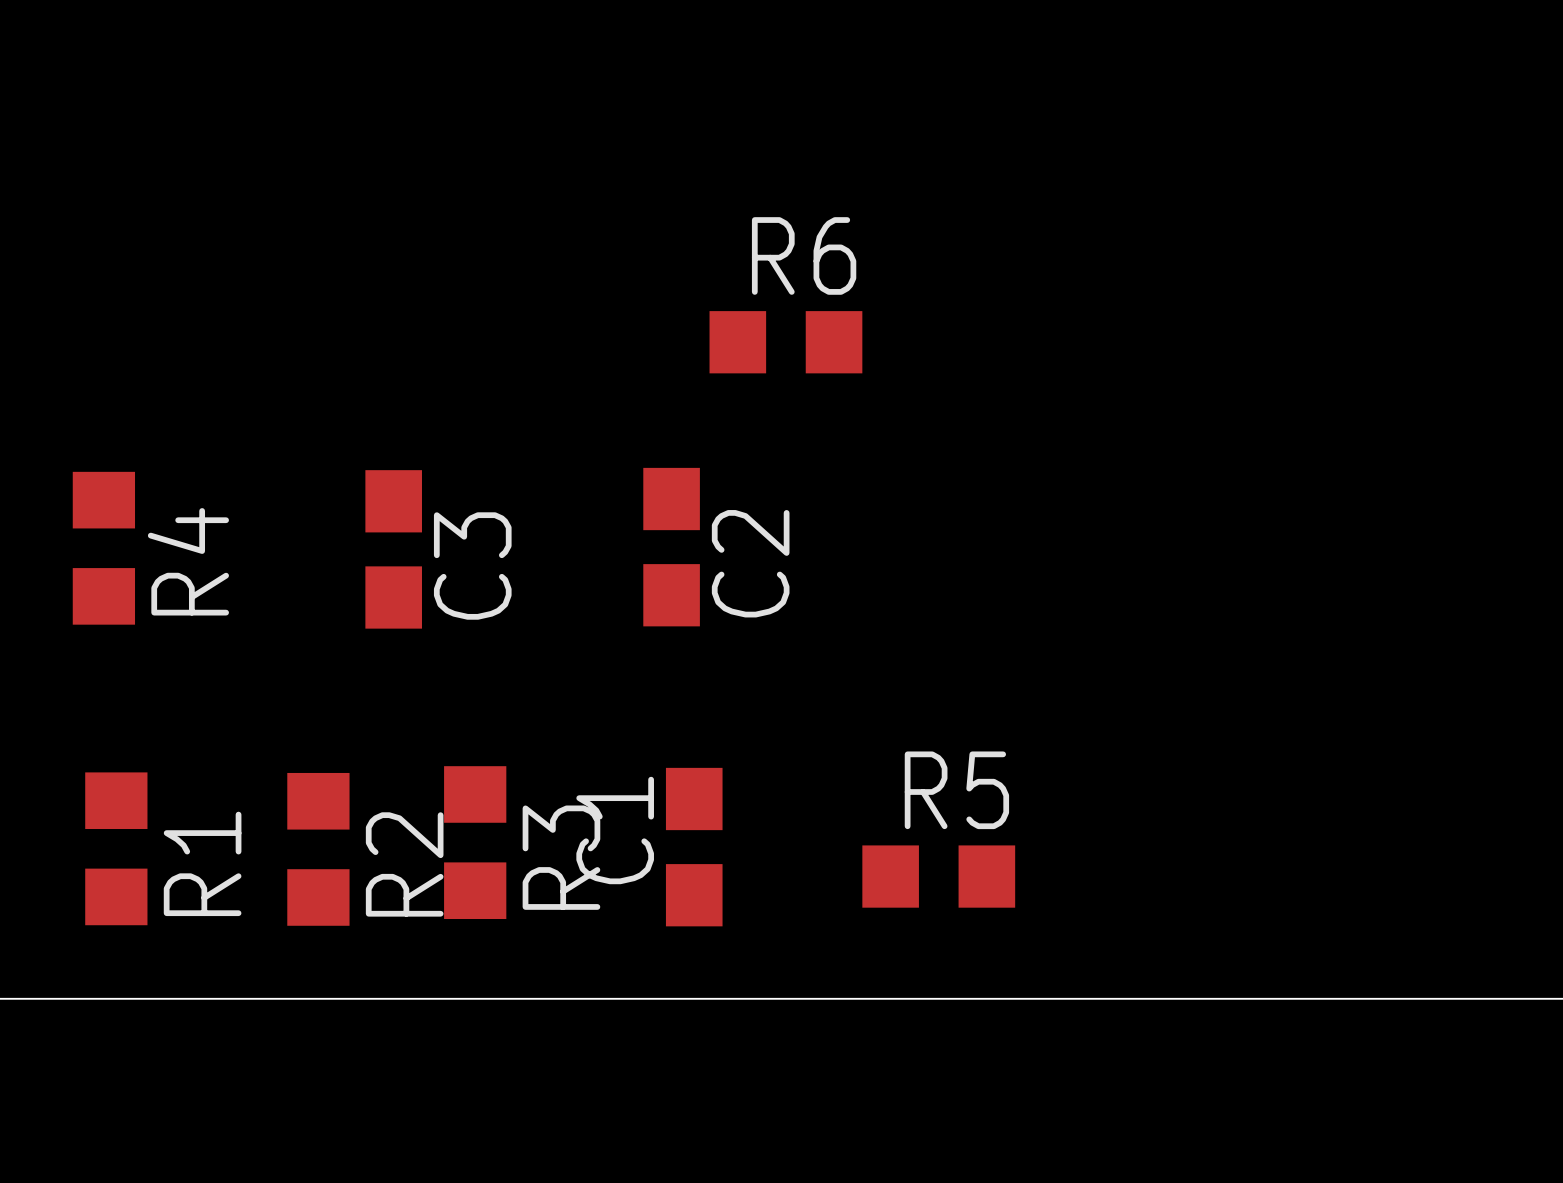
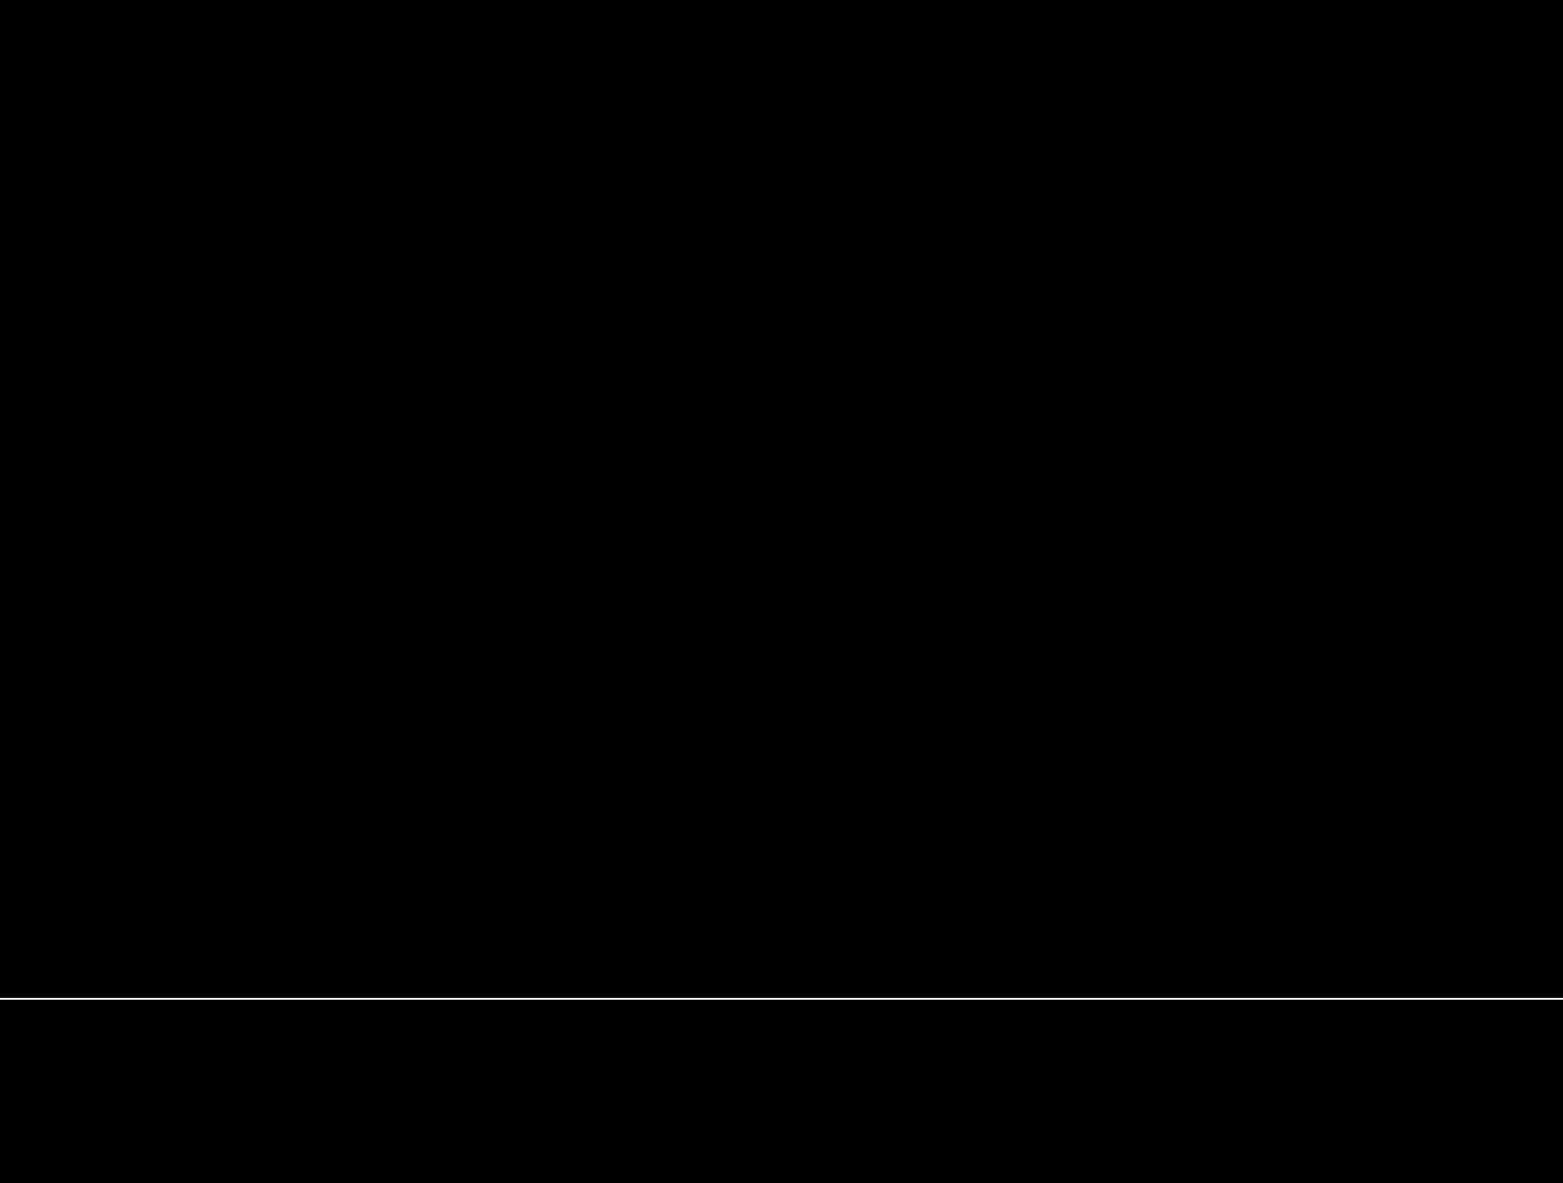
R6: (785, 342) -> none
C2: (671, 547) -> none
R4: (103, 548) -> none
C3: (393, 549) -> none
R3: (475, 842) -> none
C1: (694, 847) -> none
R1: (116, 848) -> none
R2: (318, 849) -> none
R5: (938, 876) -> none

